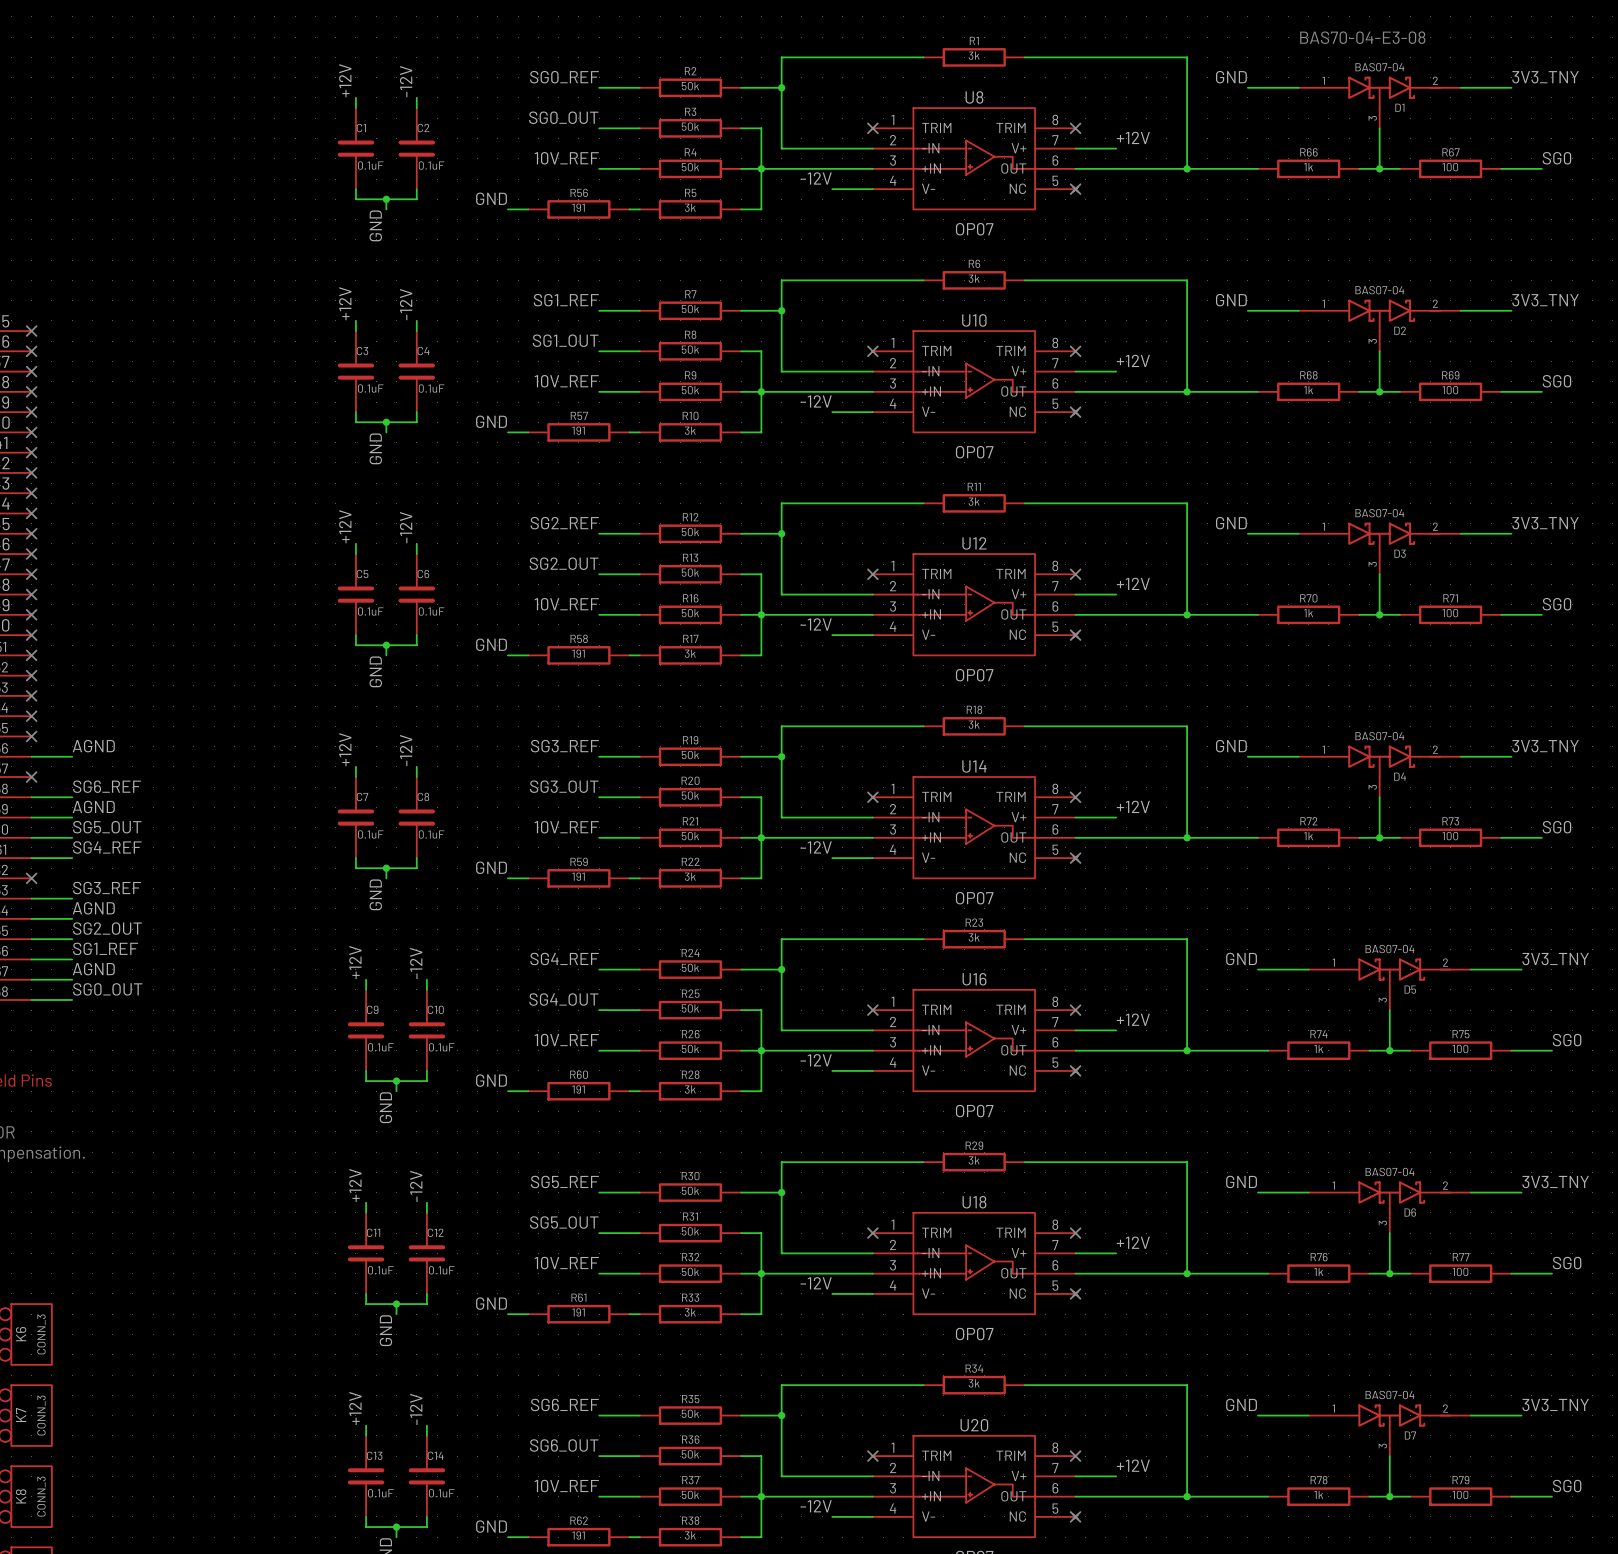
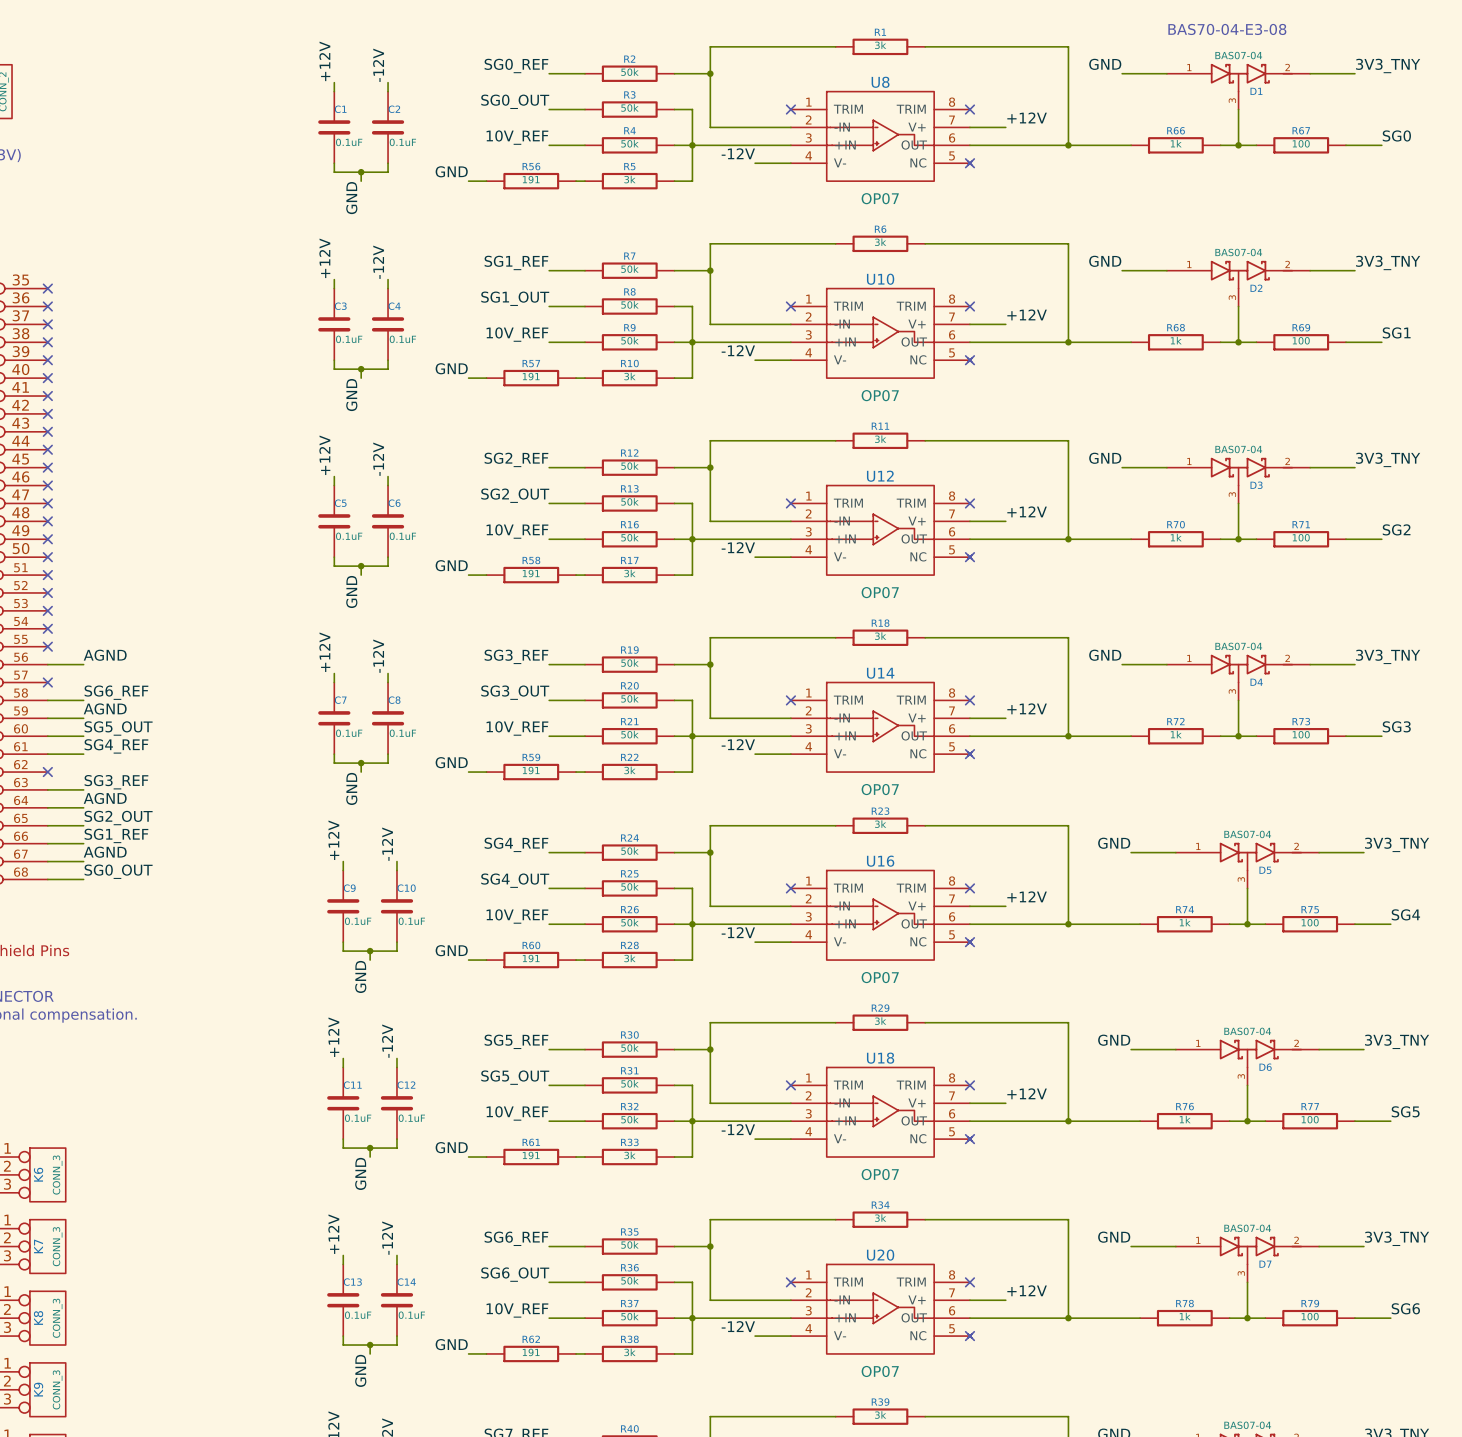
label: SG0 (1556, 381) -> SG1 (1396, 332)
label: SG0 (1556, 604) -> SG2 (1396, 529)
label: SG0 (1556, 827) -> SG3 (1396, 726)
label: SG0 (1567, 1040) -> SG4 (1405, 914)
label: SG0 (1567, 1263) -> SG5 (1405, 1111)
label: SG0 (1567, 1486) -> SG6 (1405, 1308)

